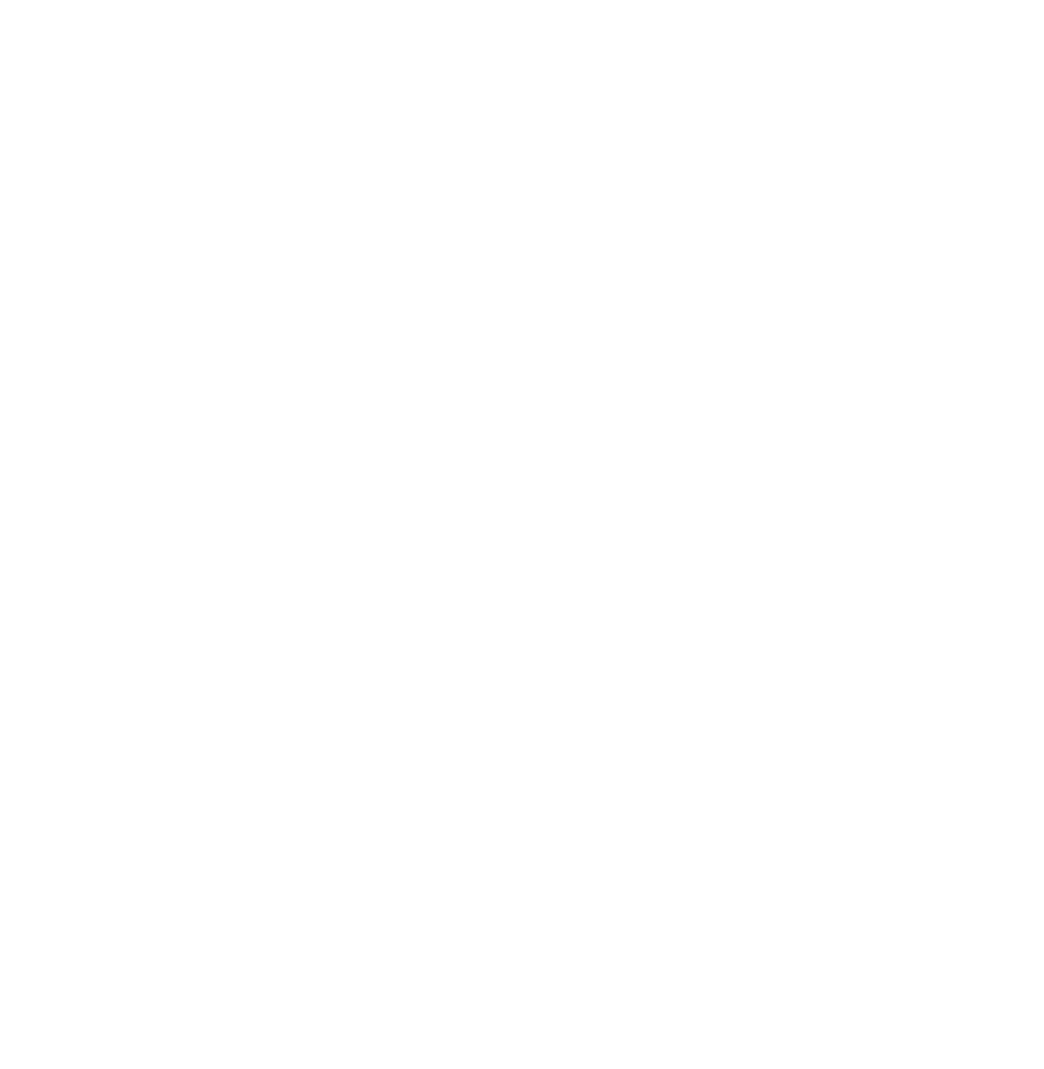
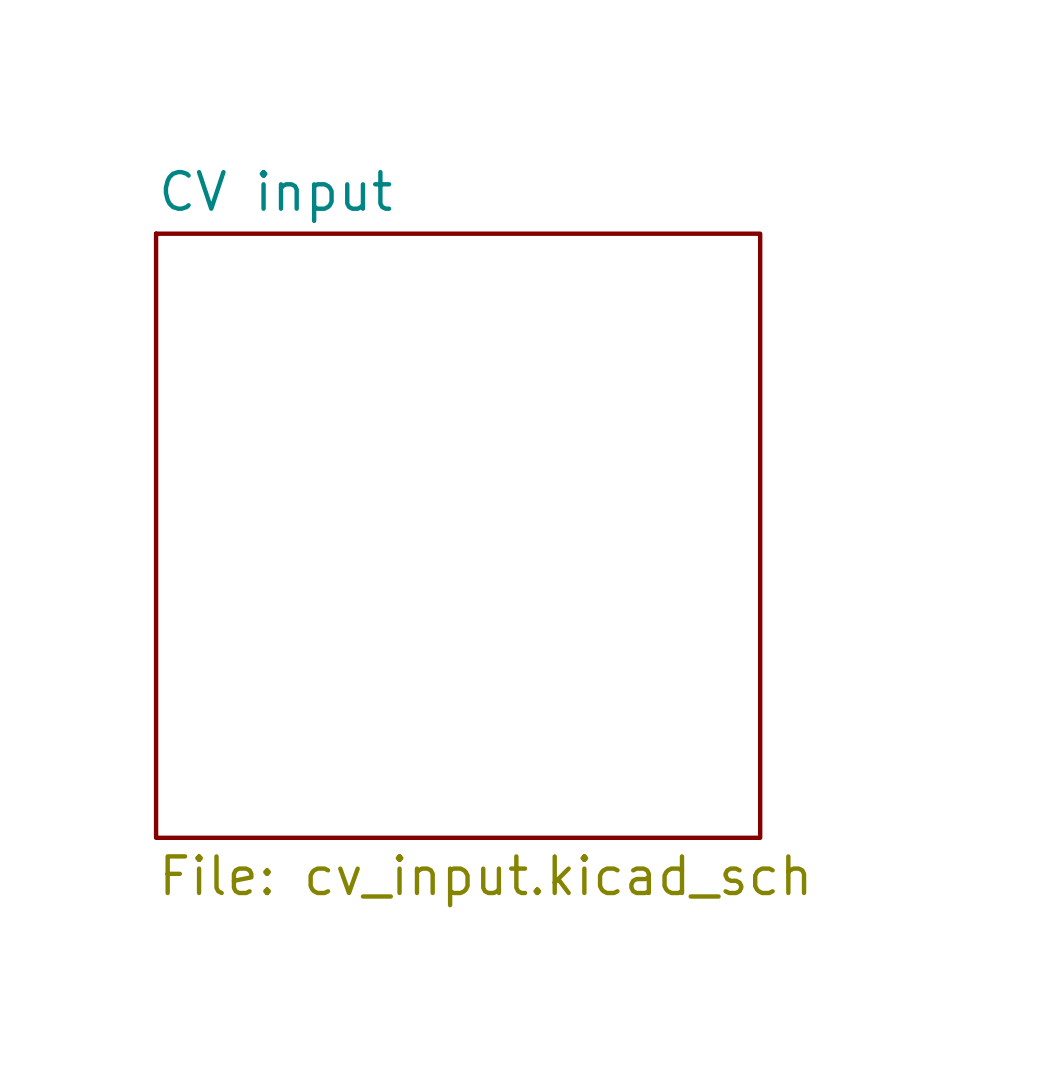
sheet CV input: none -> File: cv_input.kicad_sch (458, 535)

